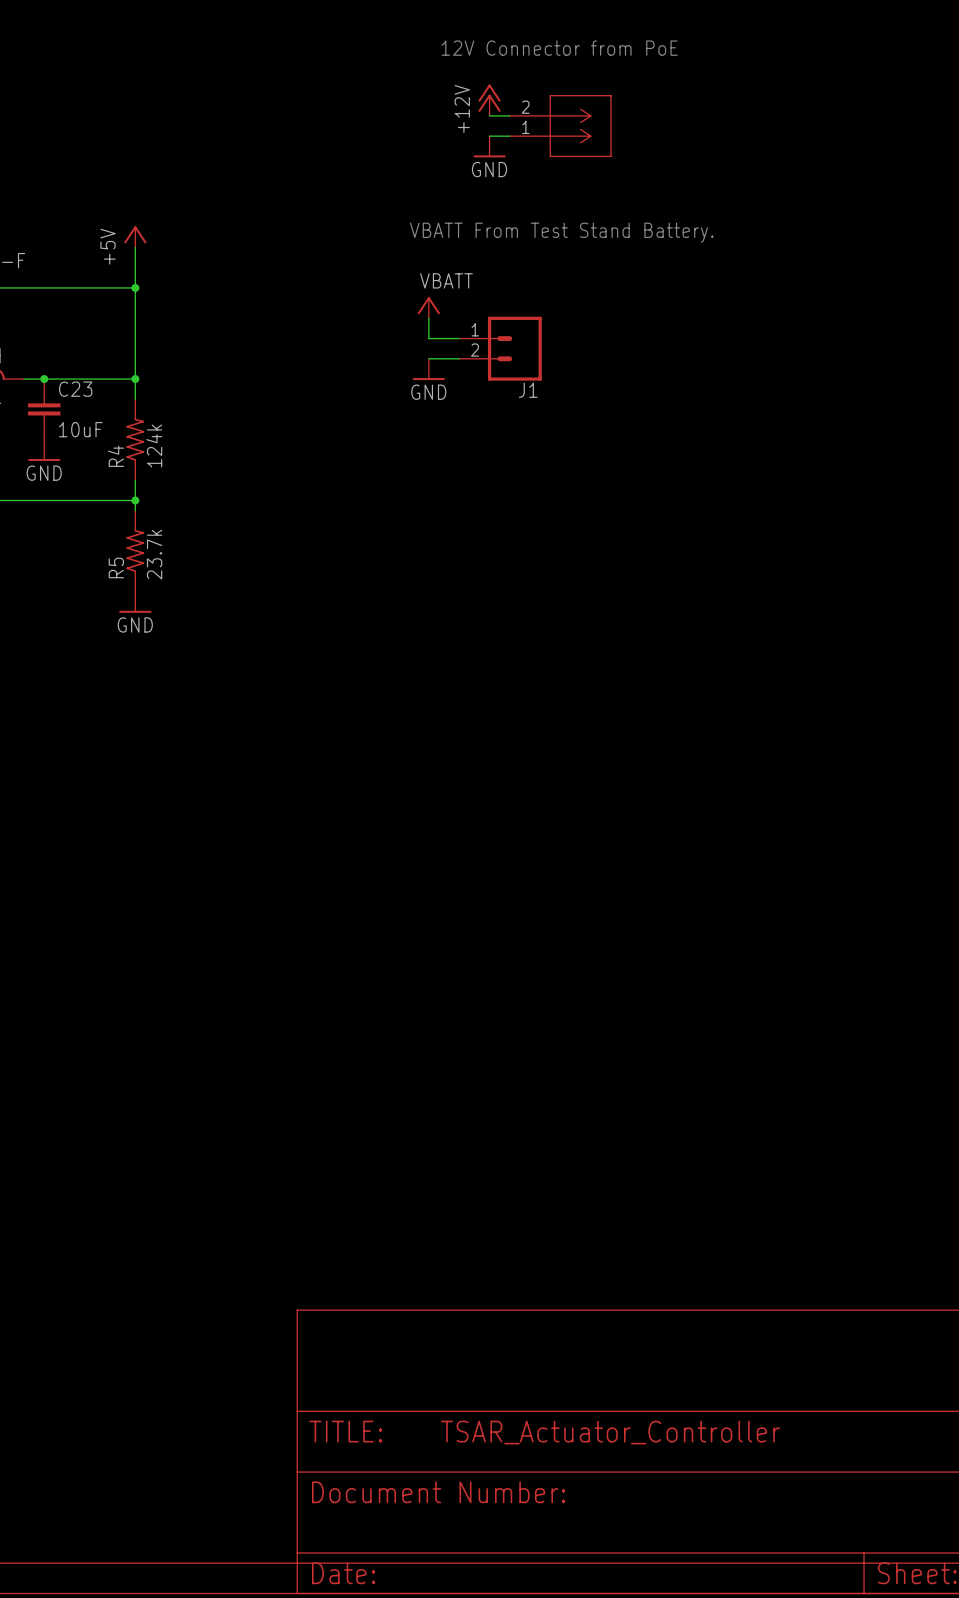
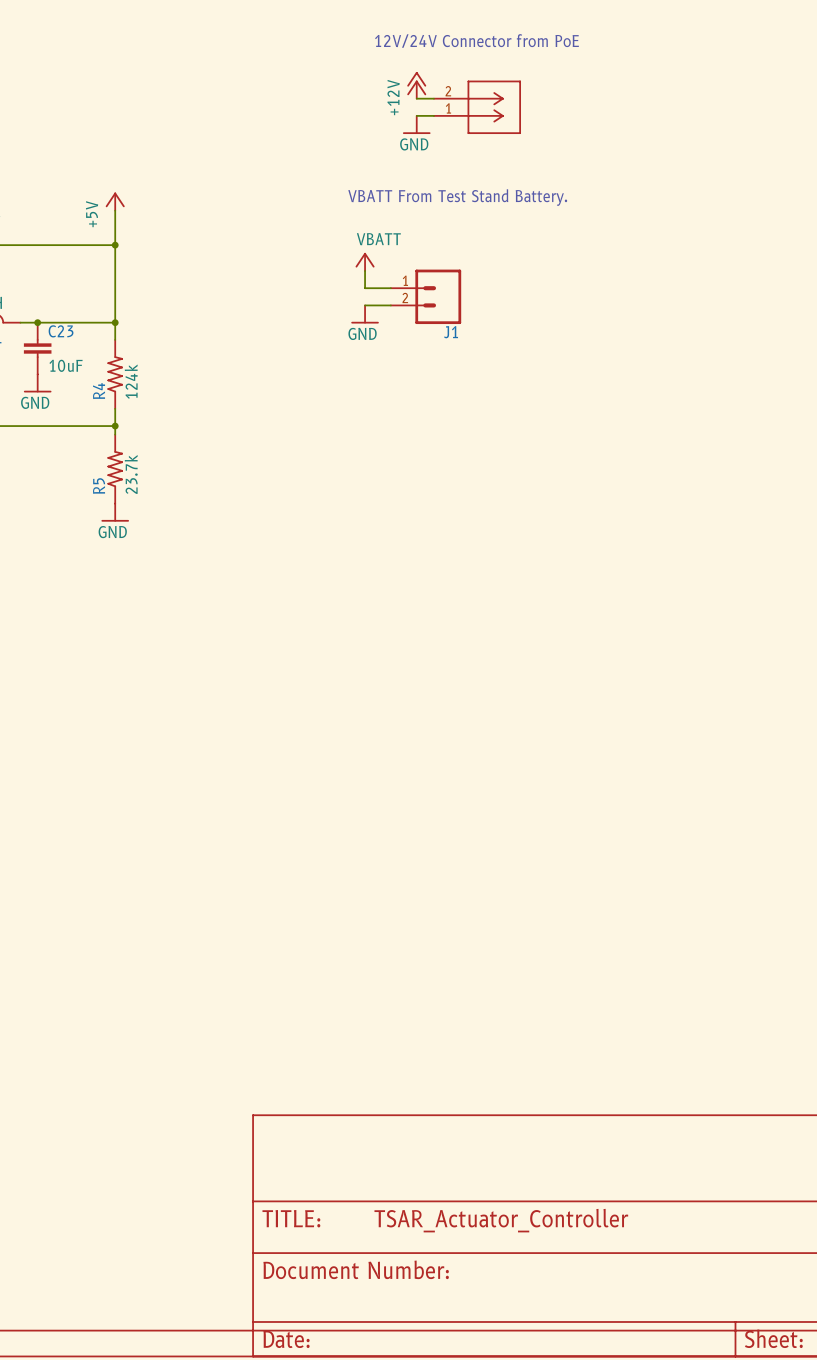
text: 12V Connector from PoE (559, 48) -> 12V/24V Connector from PoE (477, 40)

